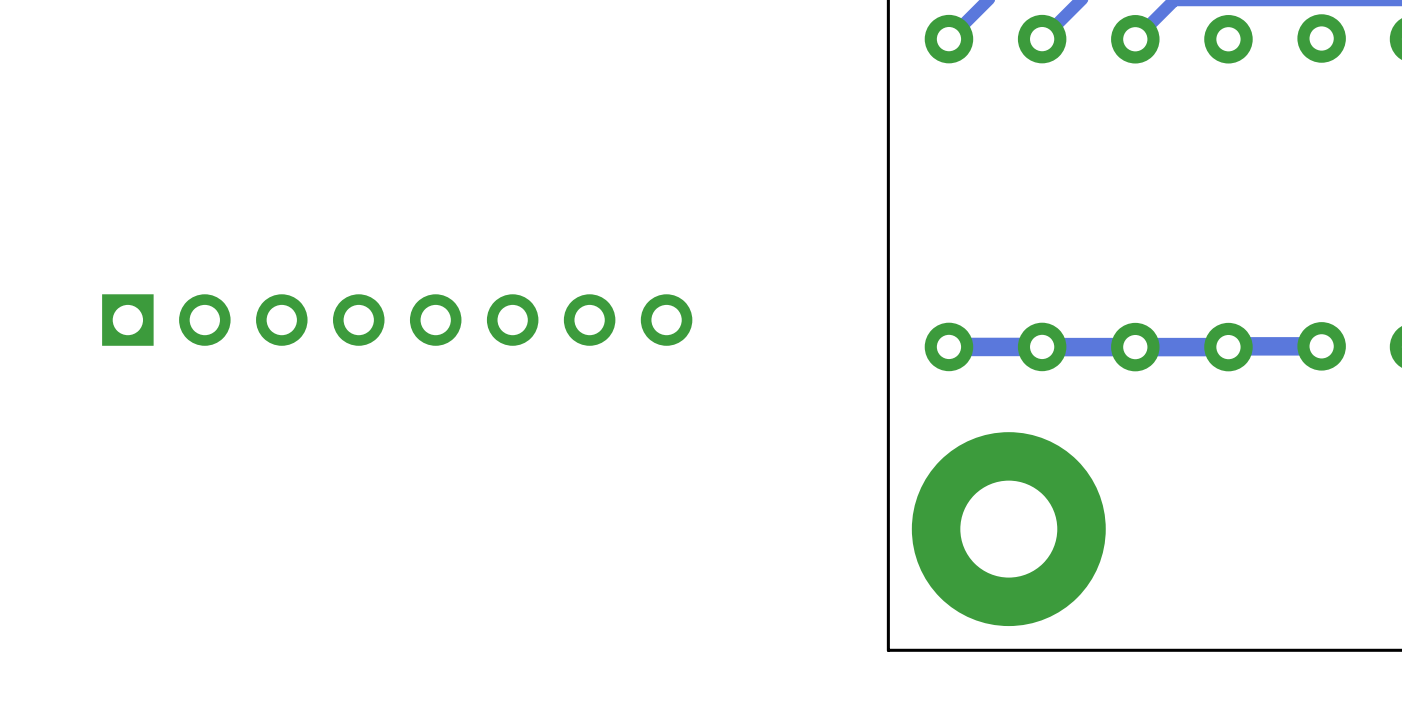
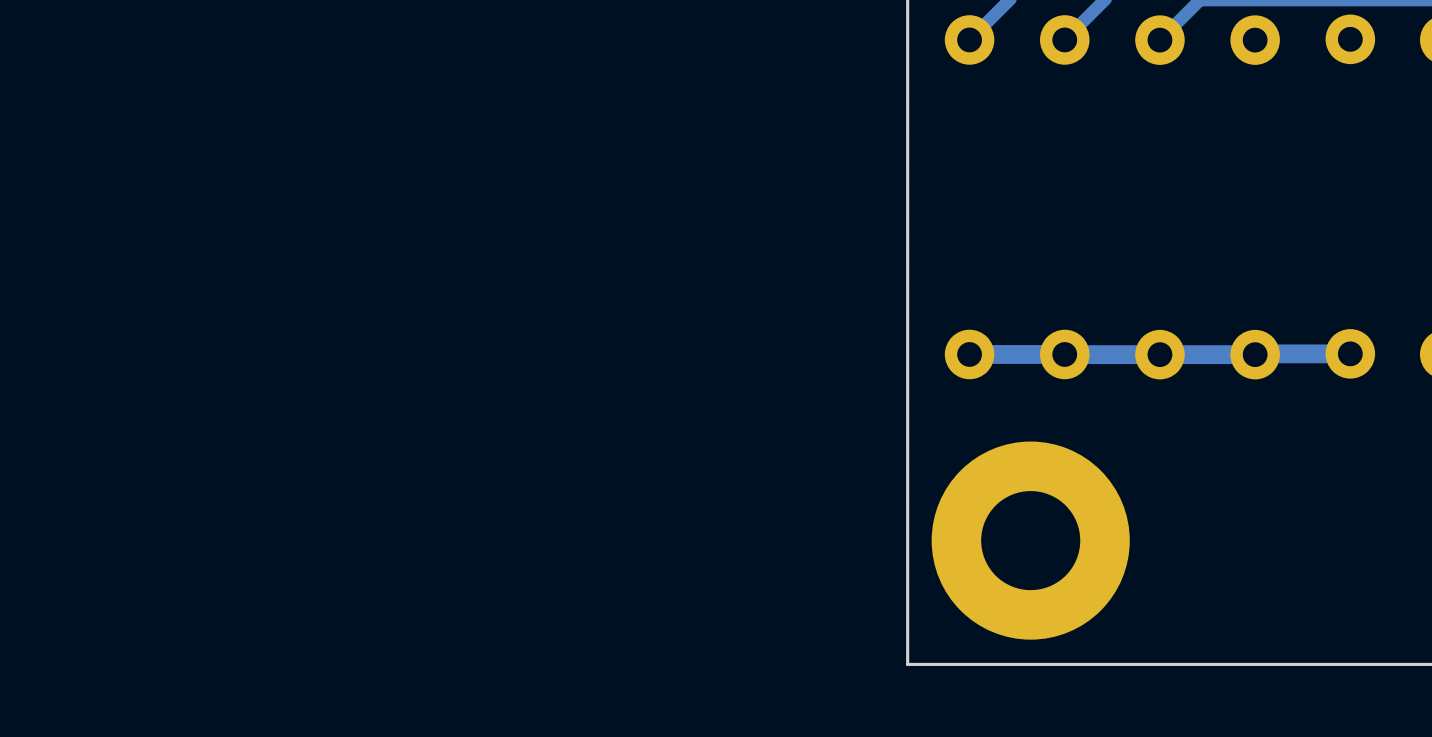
part: (397, 320) -> none

